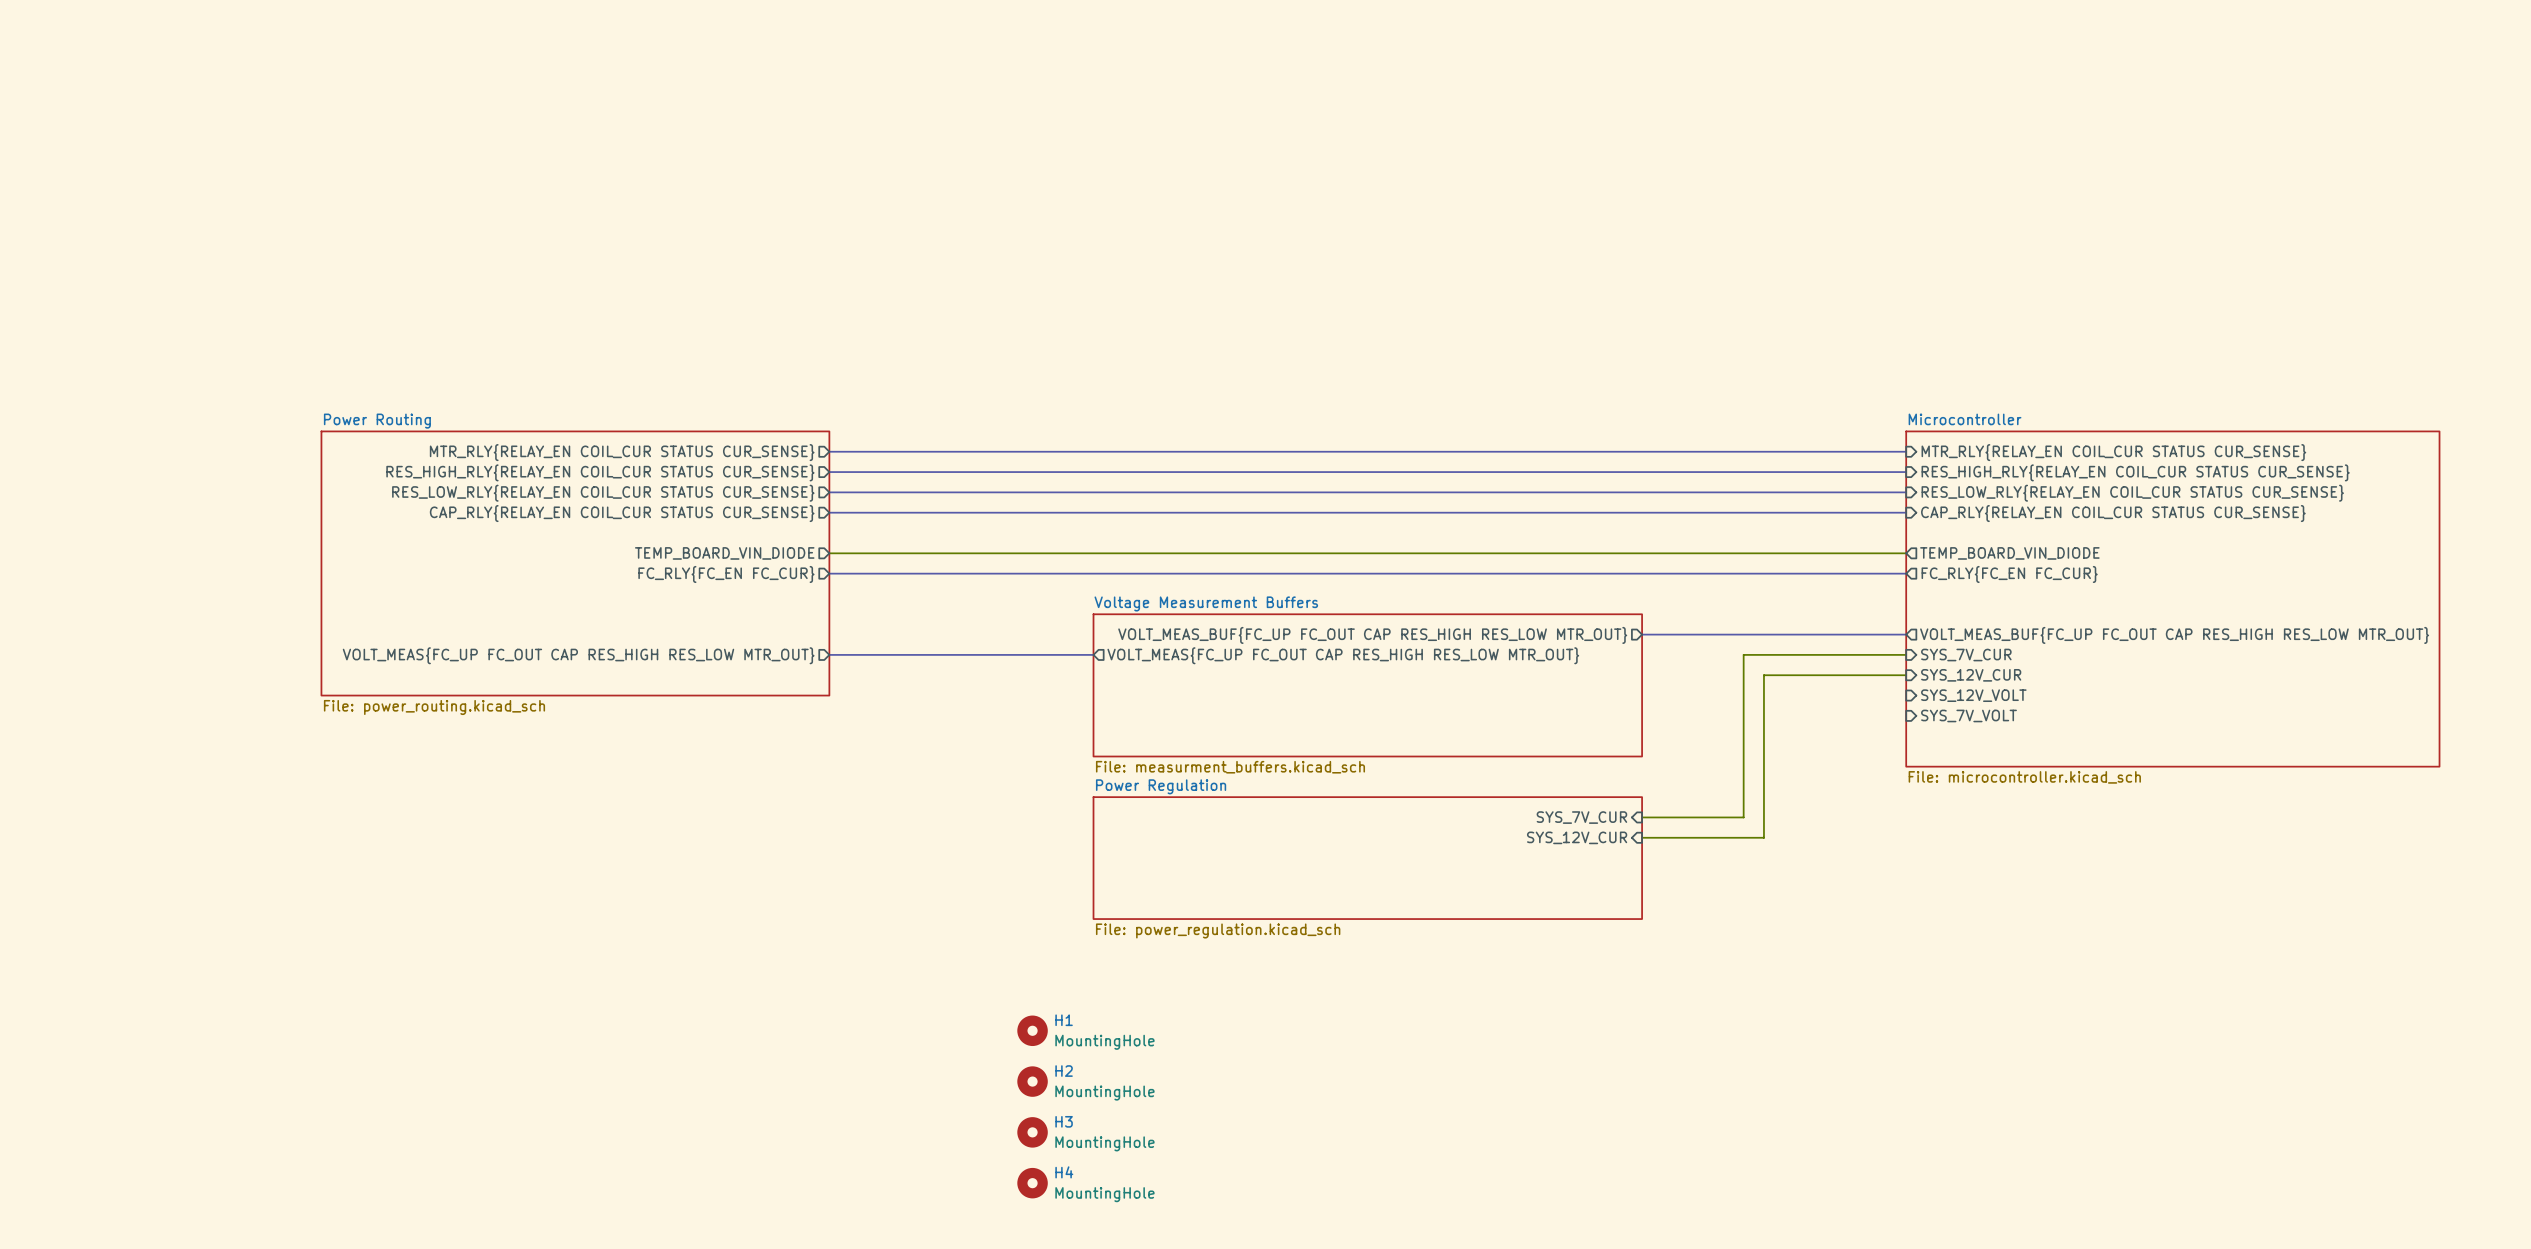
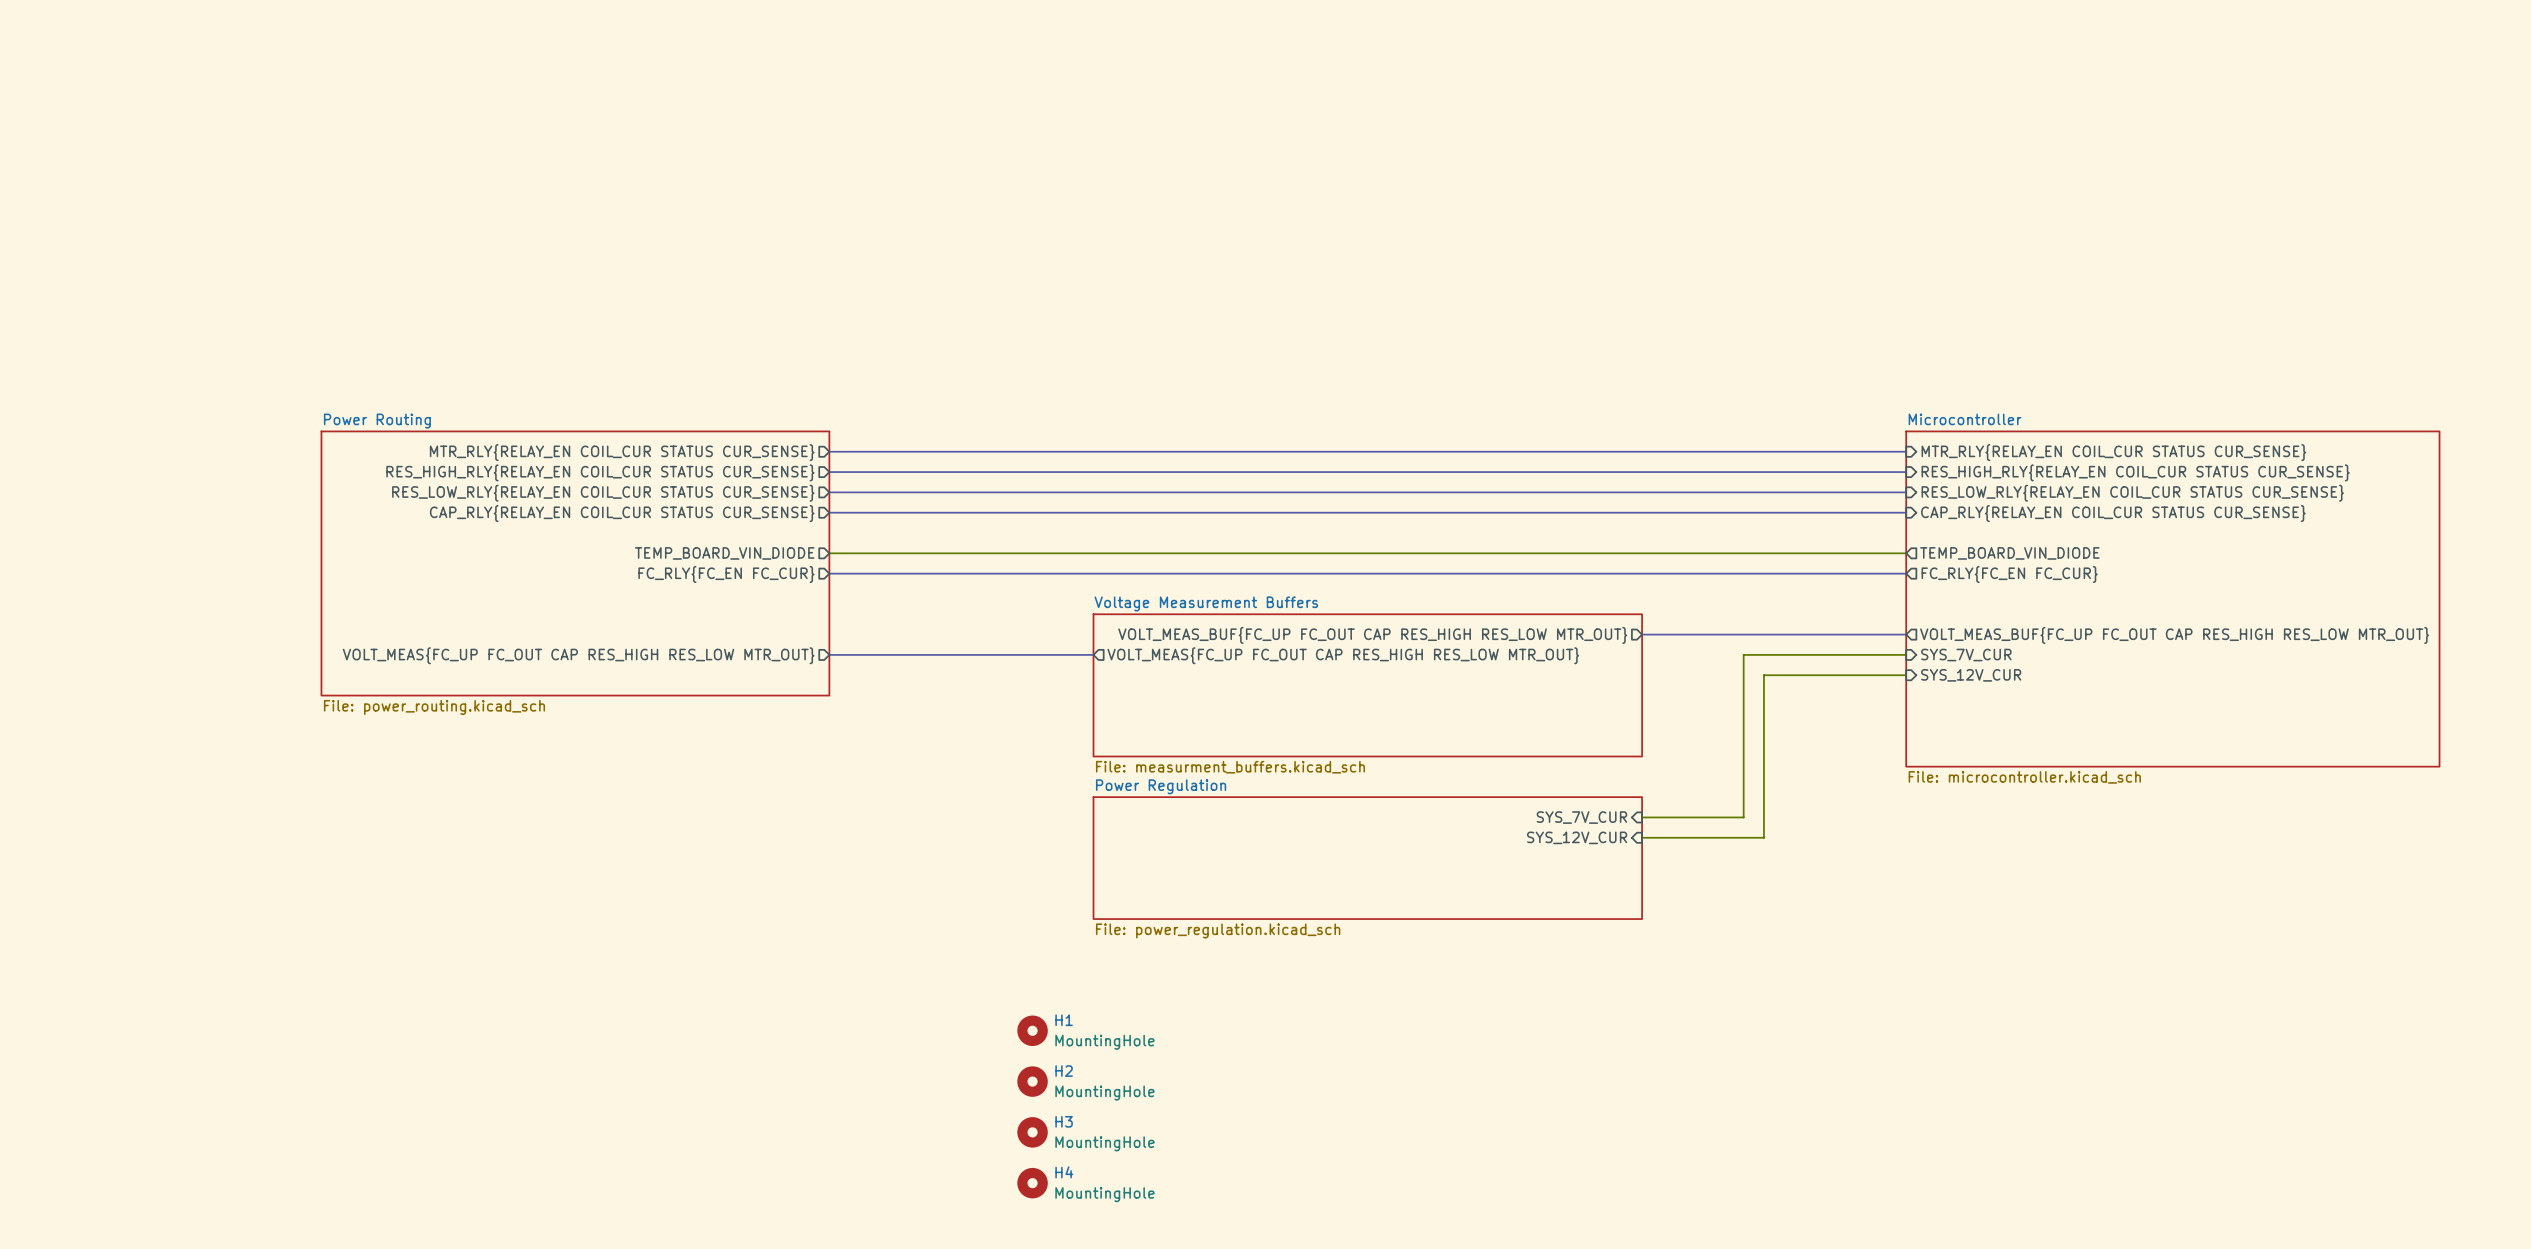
sheet pin: SYS_12V_VOLT (1973, 695) -> none
sheet pin: SYS_7V_VOLT (1969, 715) -> none

